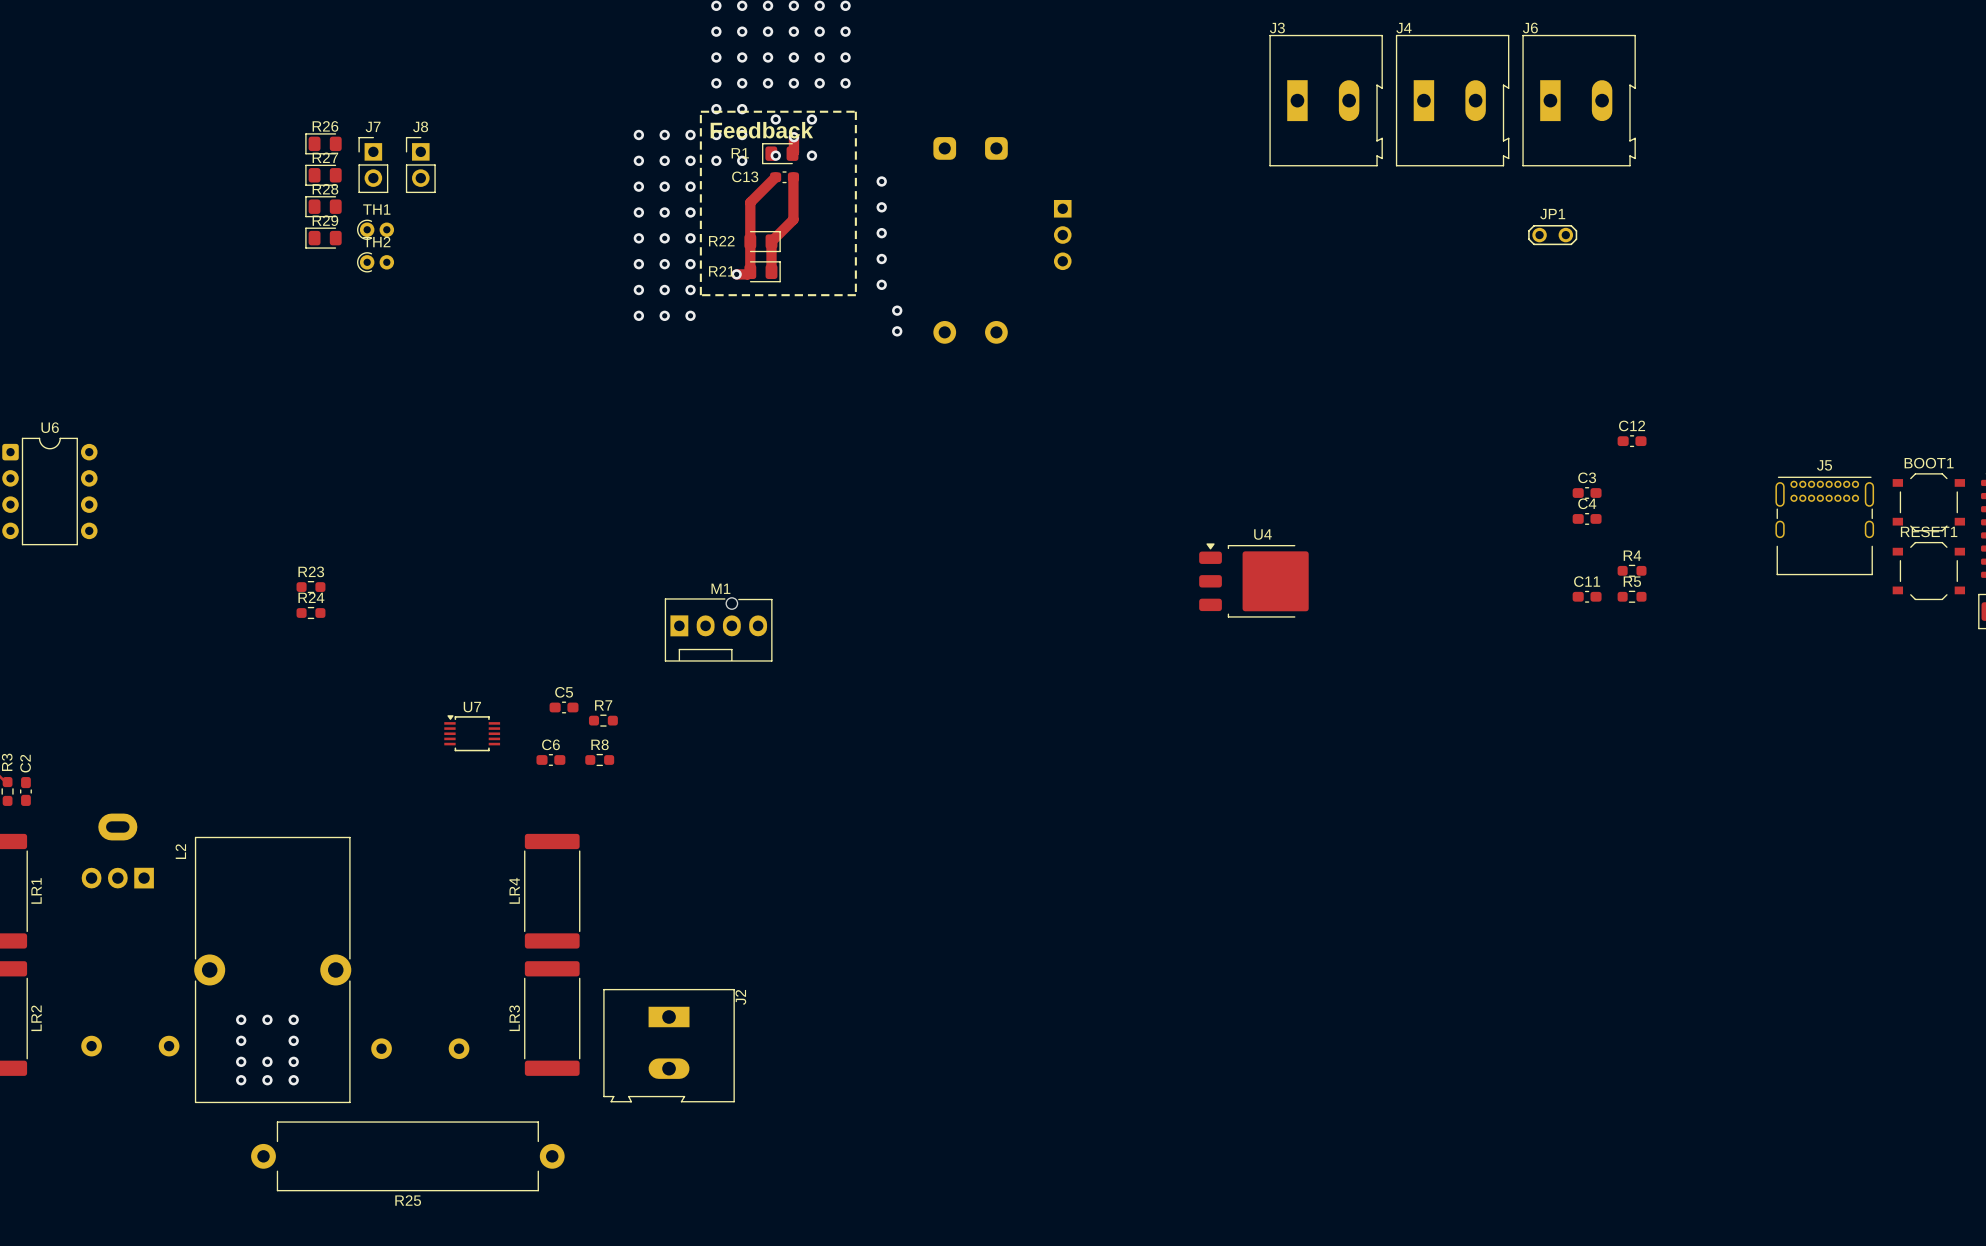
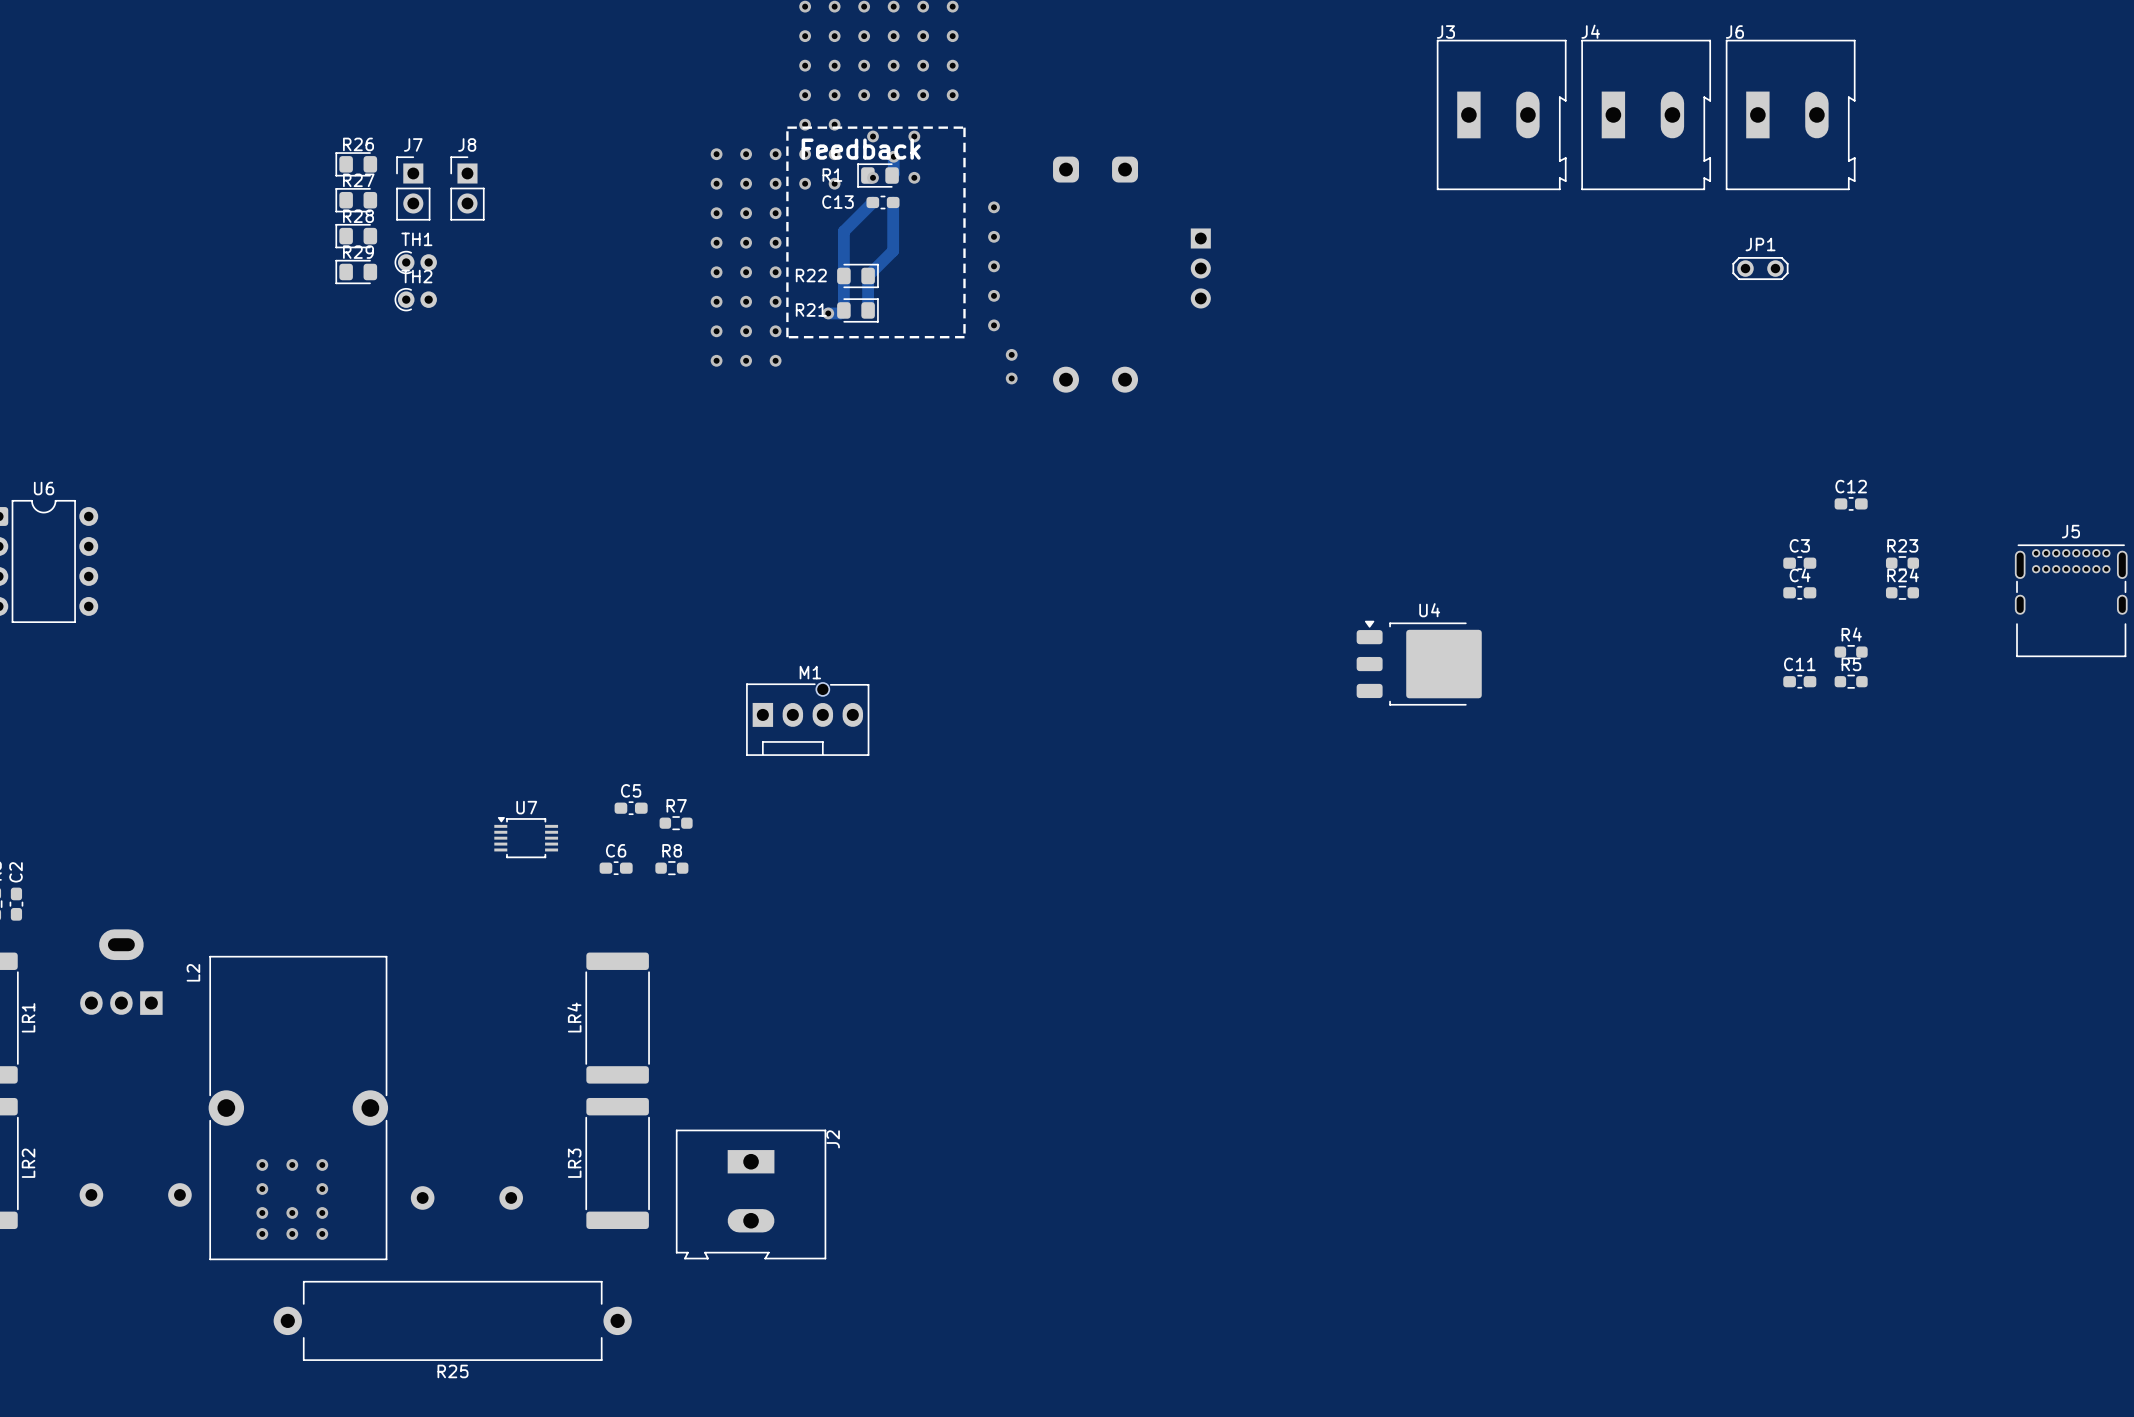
R23 position: (310, 587) -> (1902, 563)
R24 position: (310, 612) -> (1902, 592)

